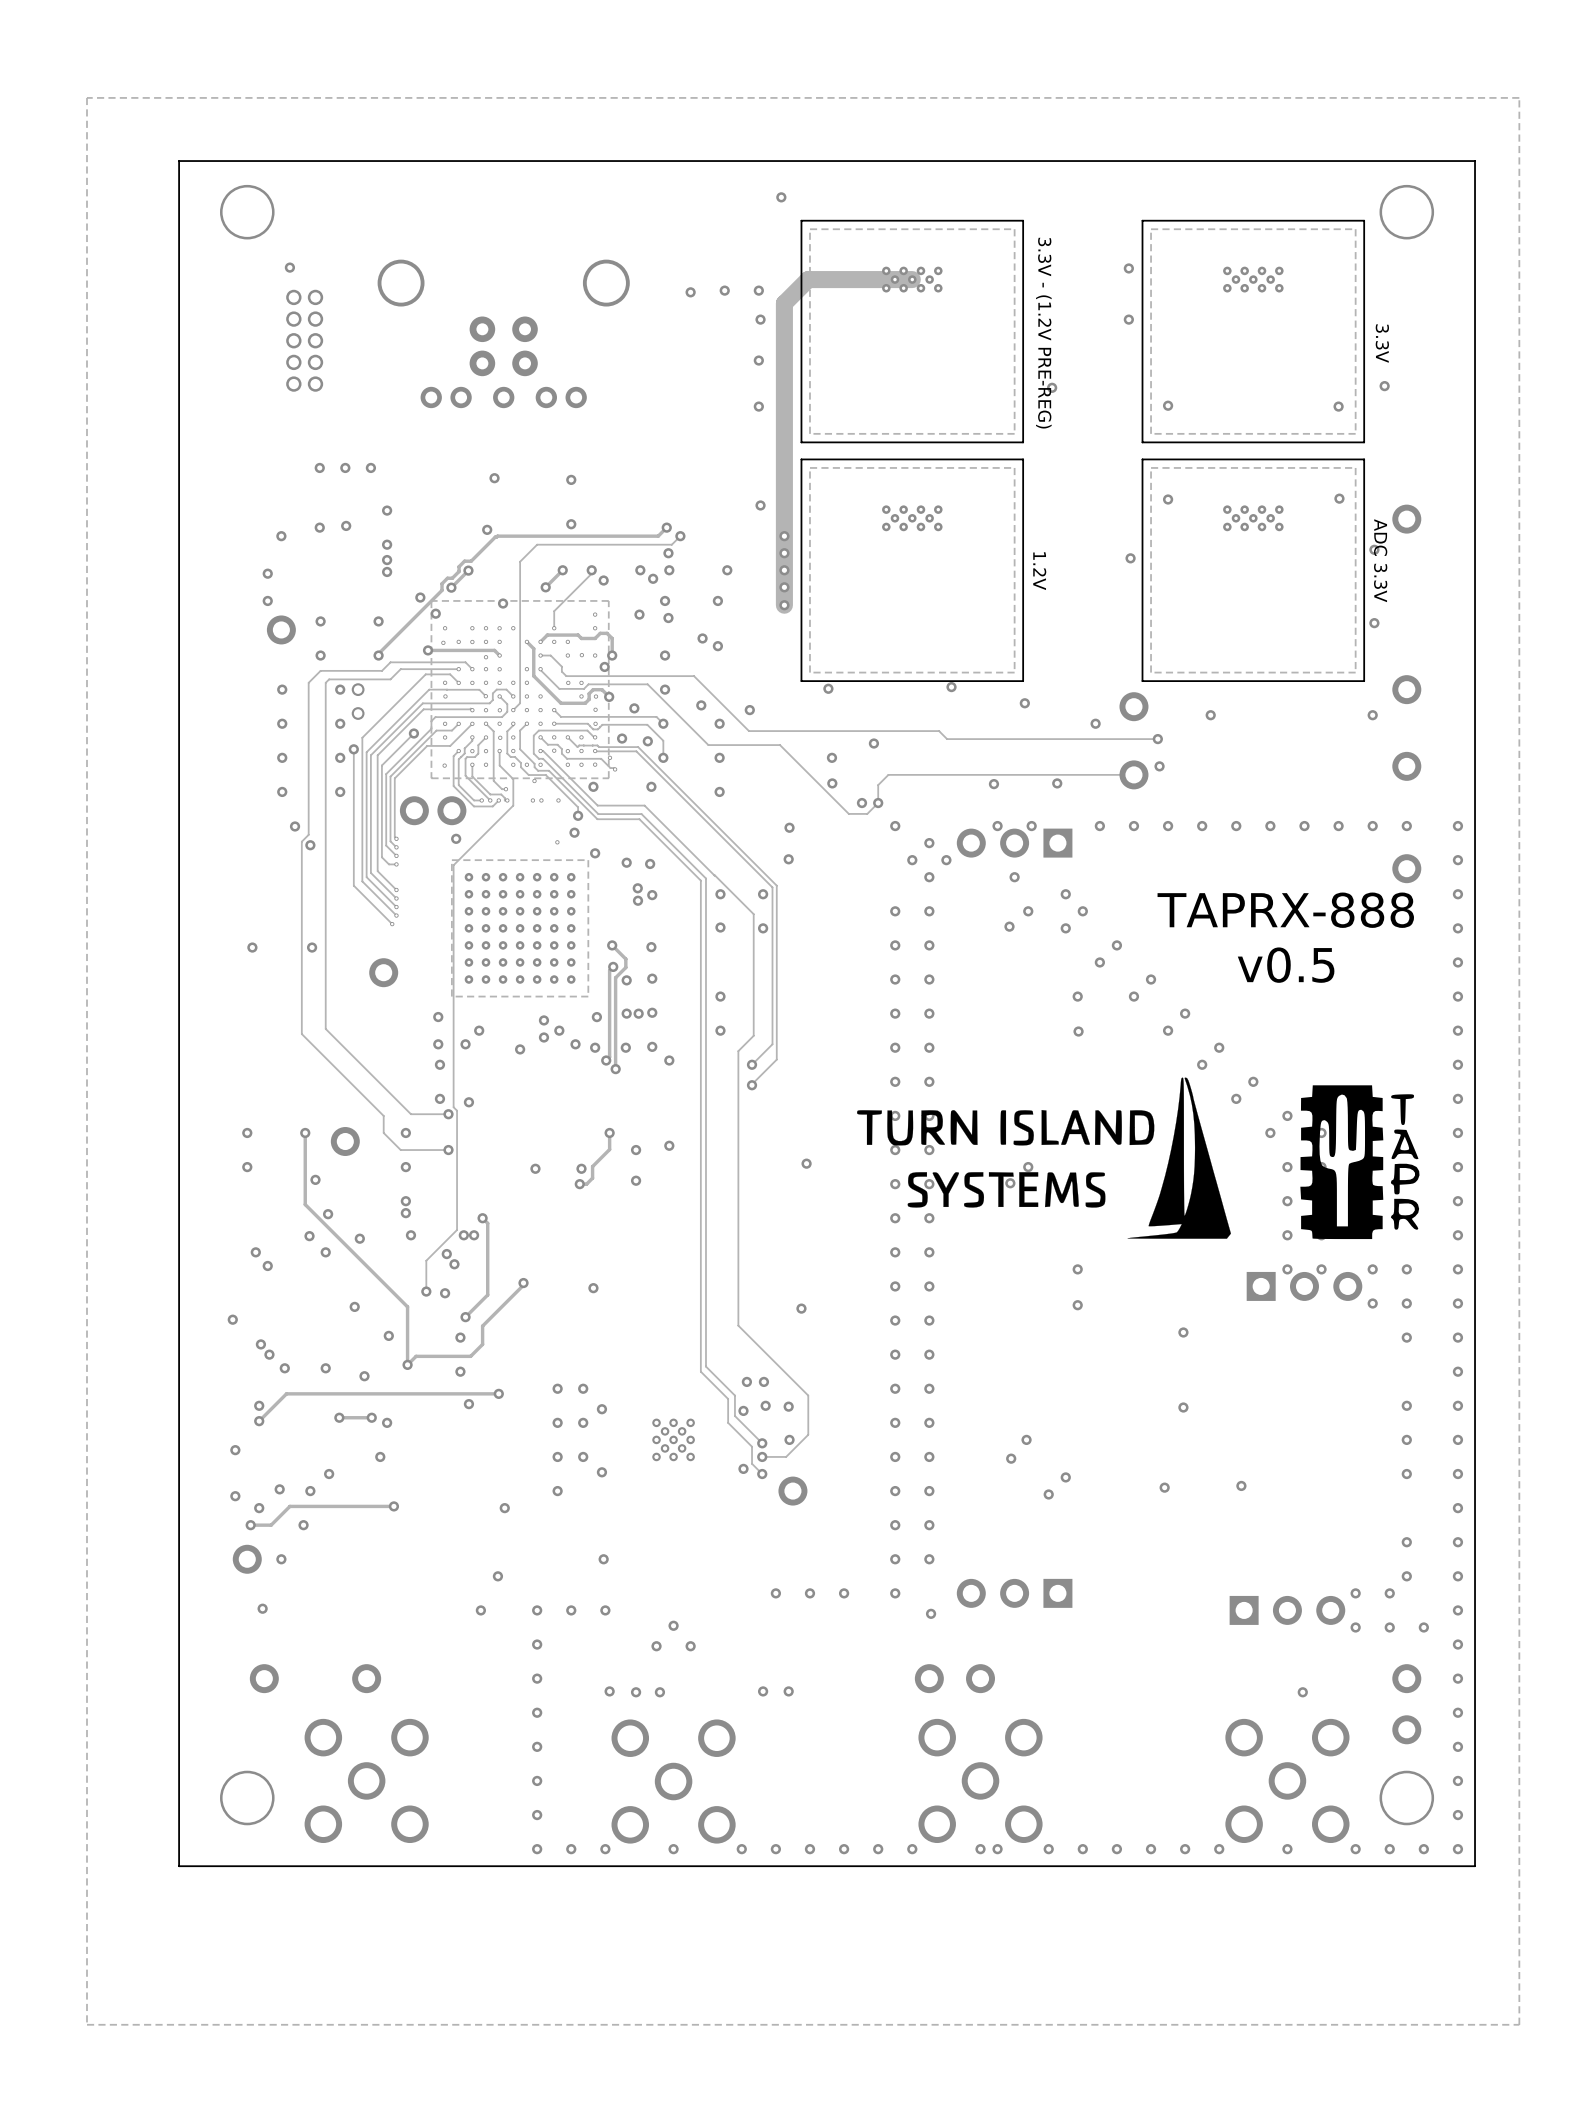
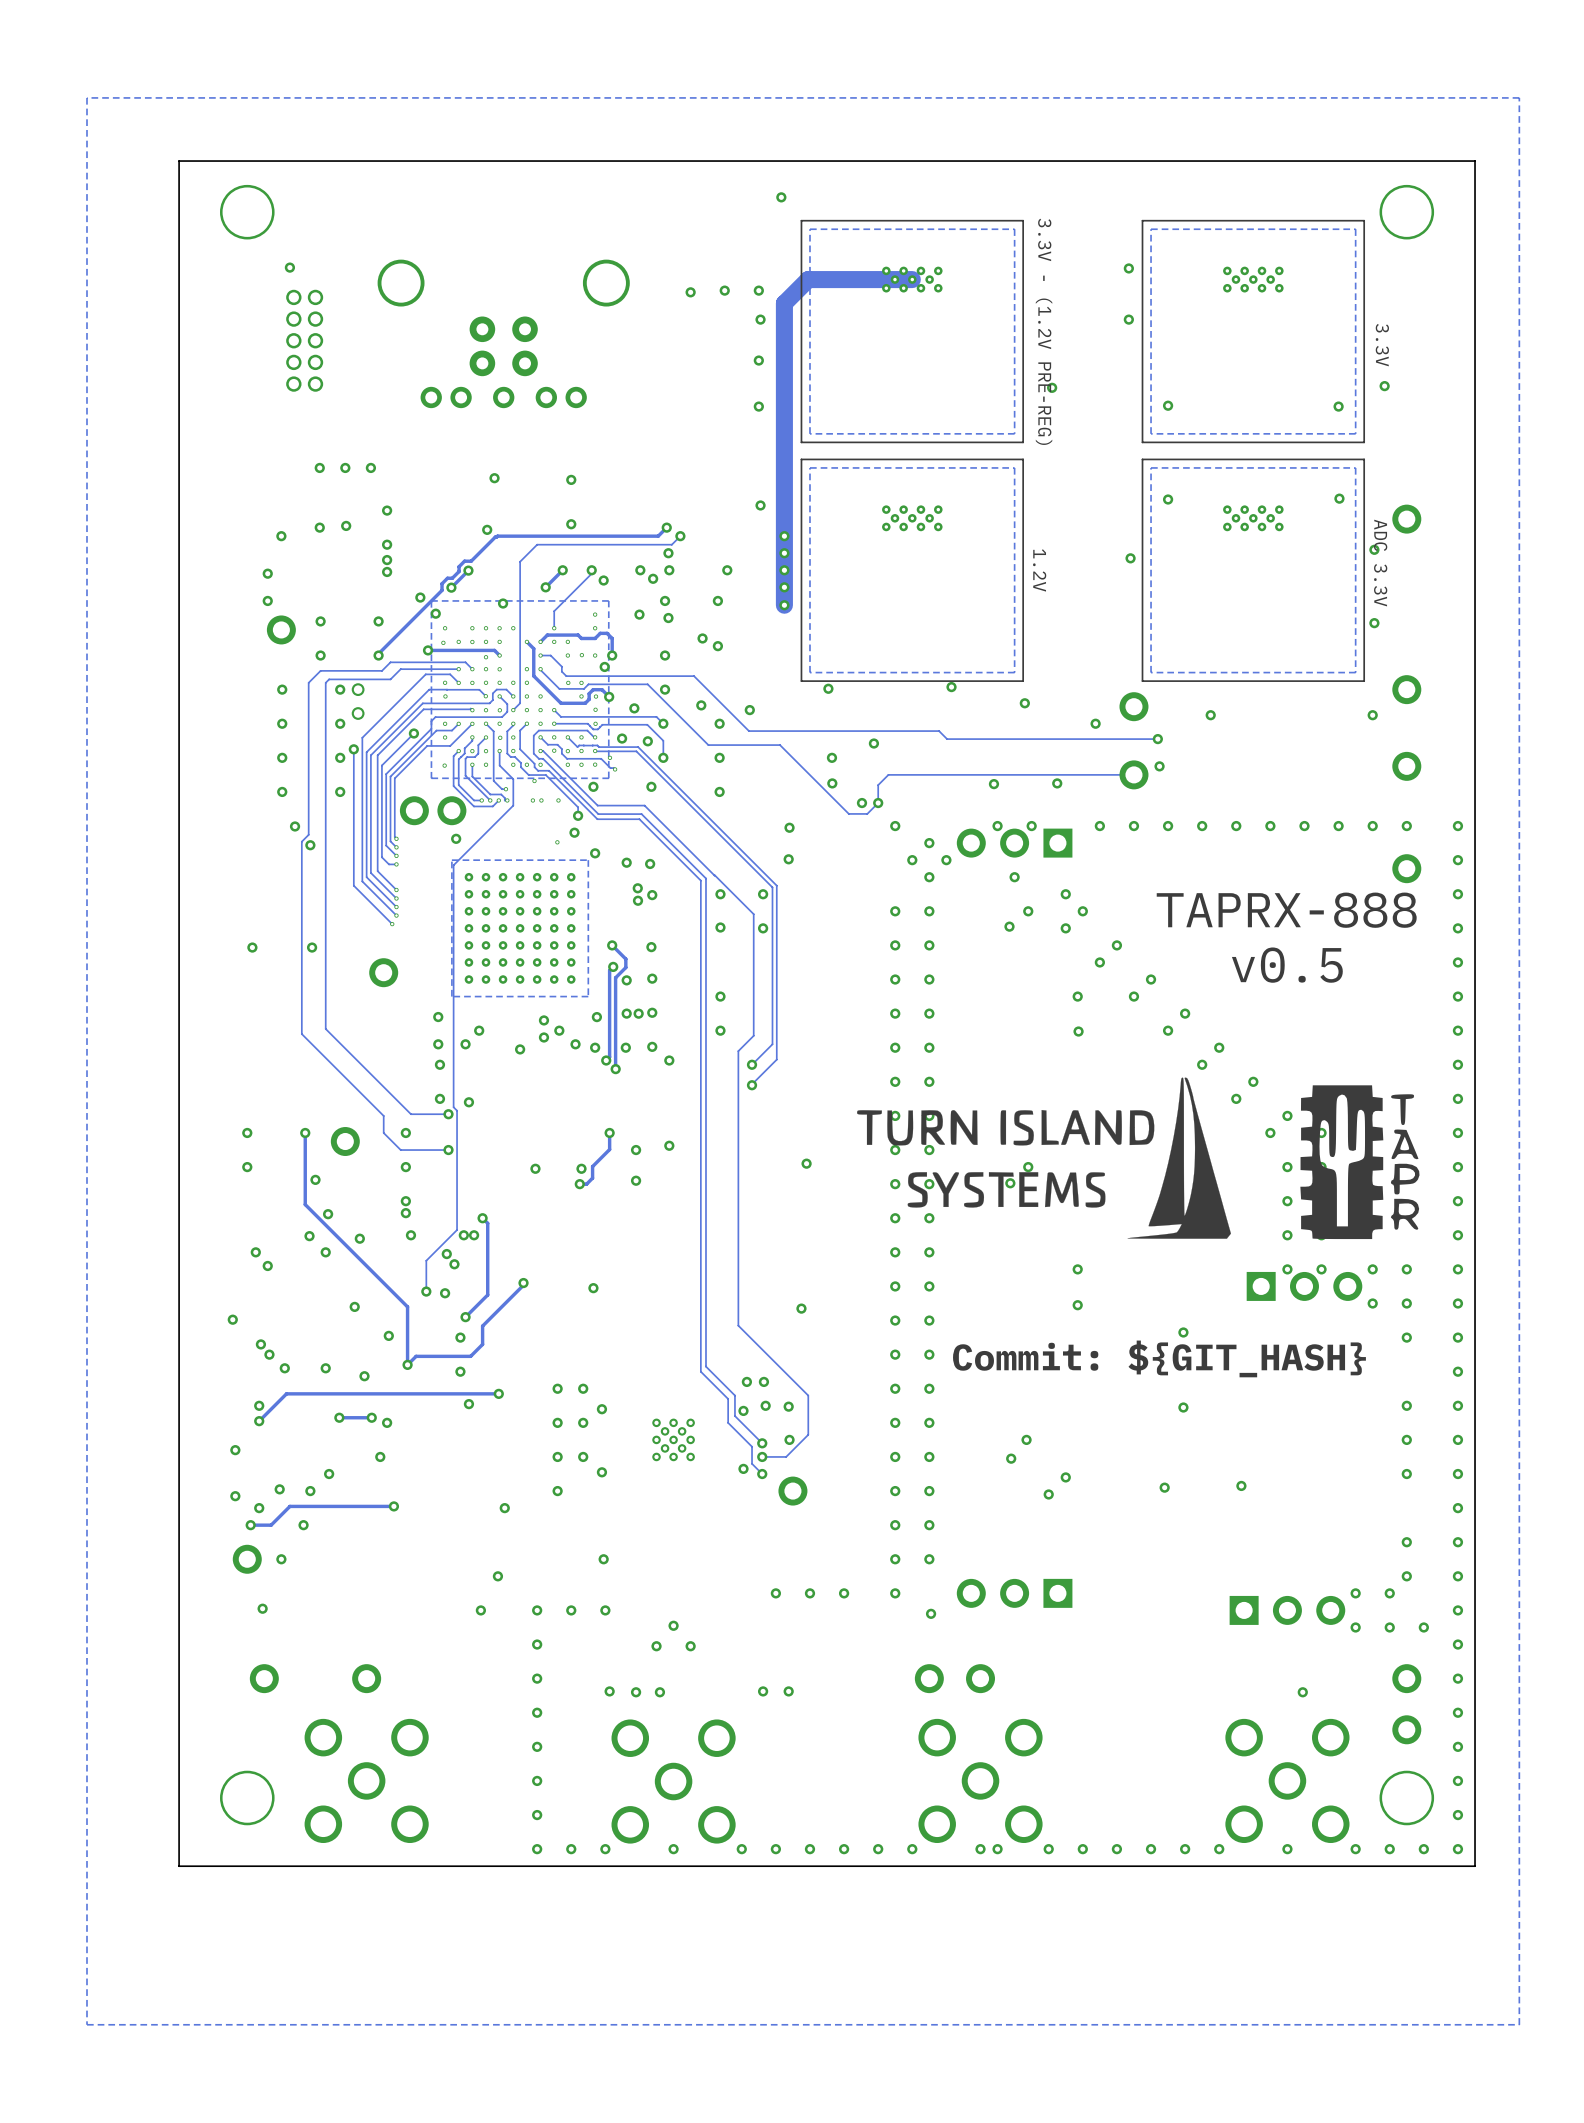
text: none -> Commit: ${GIT_HASH} (1159, 1358)

